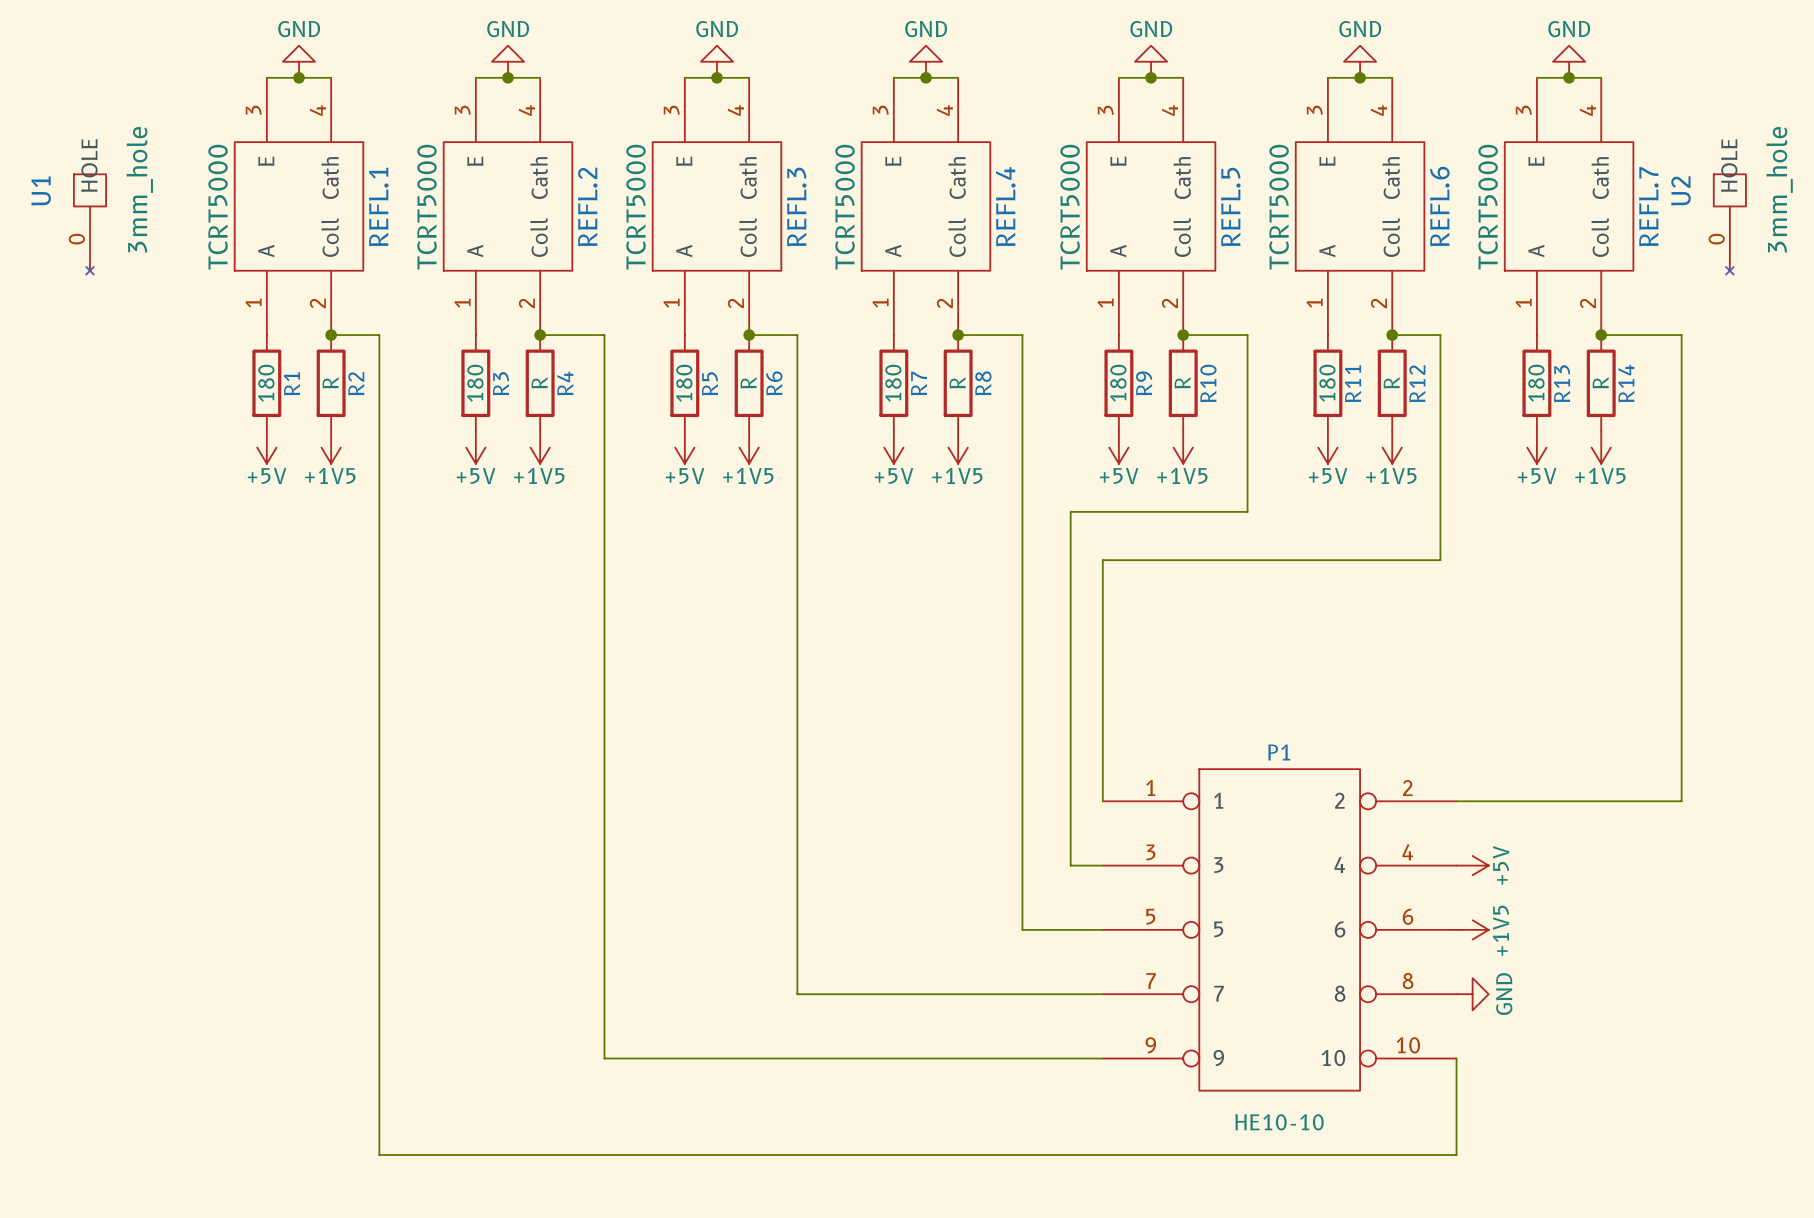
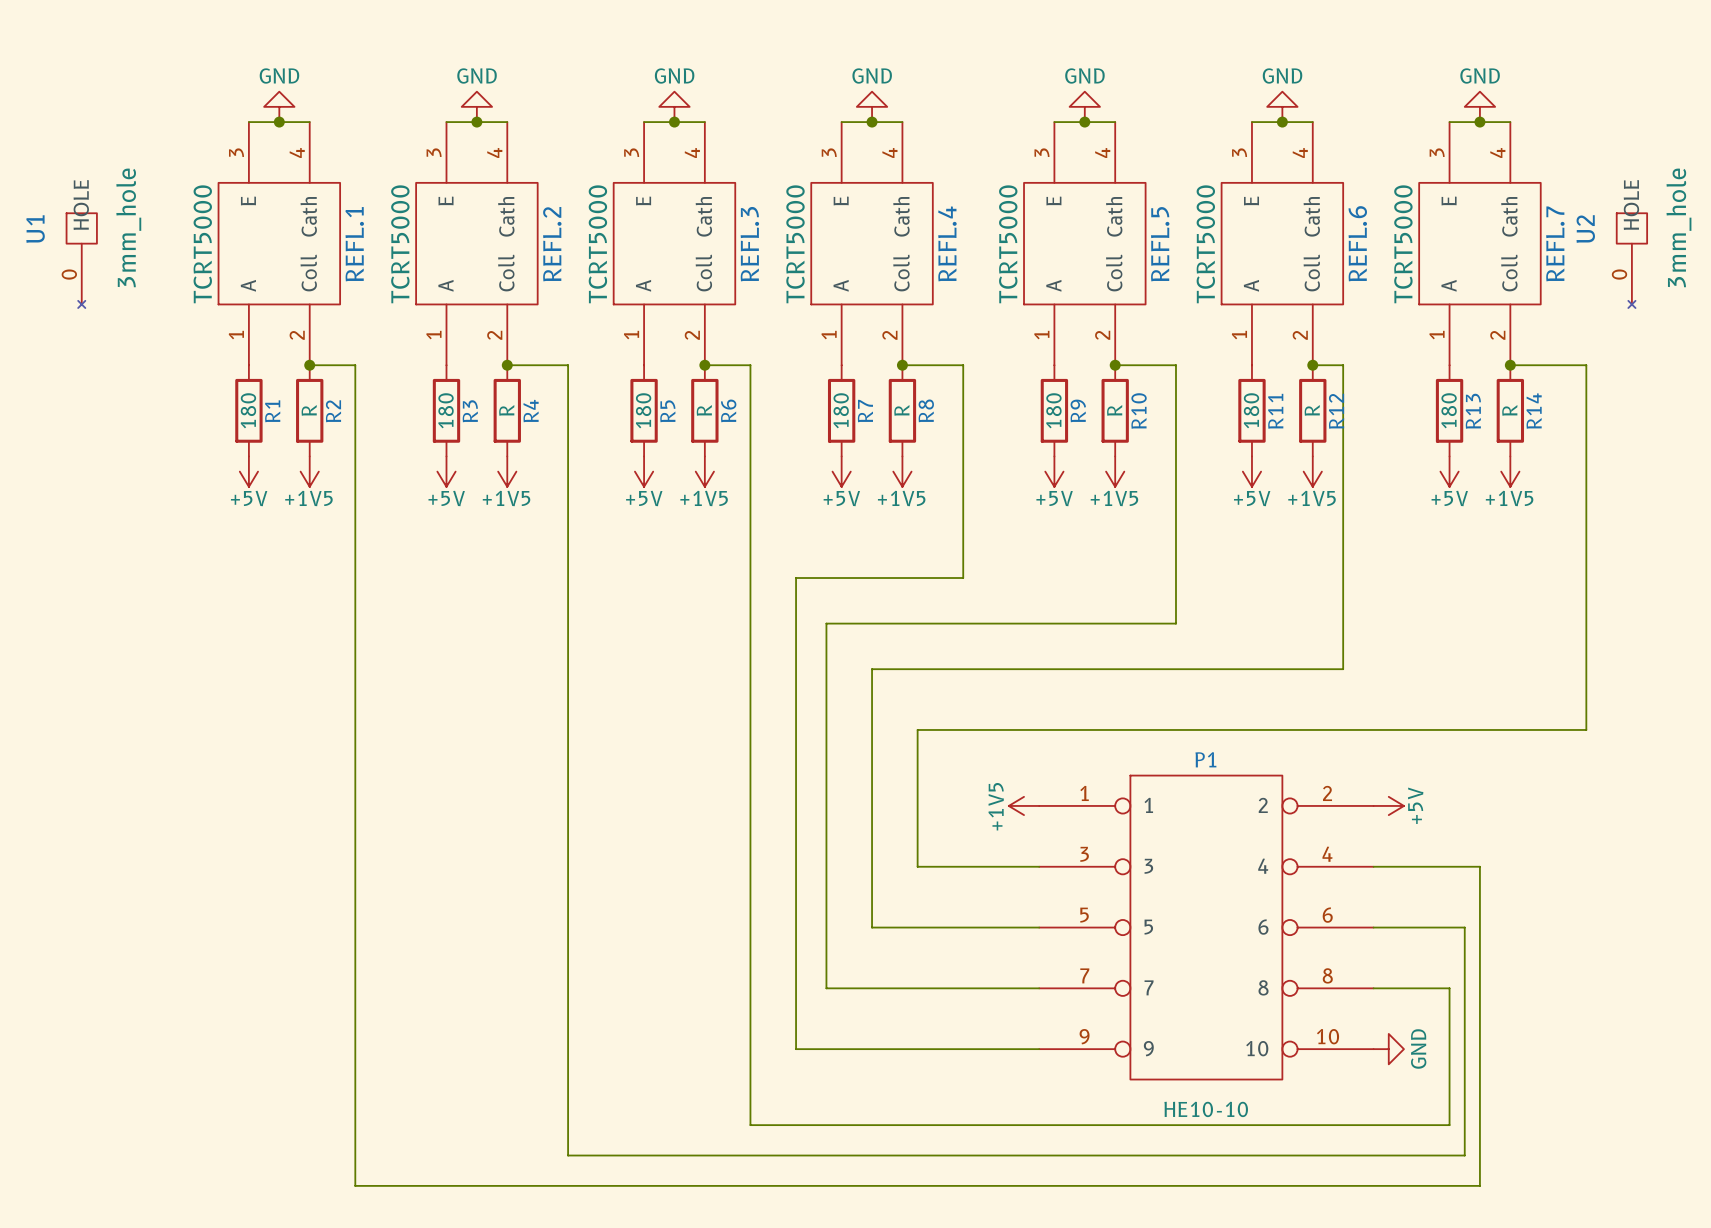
wire: (1424, 335) (1440, 335) (1440, 560) (1102, 560) (1102, 801) -> (1343, 365) (1343, 669) (872, 669) (872, 927) (963, 927)
wire: (1247, 511) (1070, 511) (1070, 865) -> (1175, 532) (1175, 623) (826, 623) (826, 988)
wire: (1022, 560) (1022, 929) -> (963, 578) (796, 578) (796, 1049)
wire: (1681, 720) (1681, 801) (1456, 801) -> (1586, 729) (917, 729) (917, 866) (1008, 866)
power symbol: none -> +1V5 (1024, 805)
power symbol position: +5V (1472, 865) -> +5V (1388, 805)
power symbol: +1V5 (1472, 929) -> none
wire: (797, 994) (877, 994) -> (750, 988) (750, 1125) (1449, 1125) (1449, 988) (1373, 988)
power symbol position: GND (1472, 994) -> GND (1388, 1049)
wire: (604, 1058) (845, 1058) -> (568, 1049) (568, 1155) (1464, 1155) (1464, 927) (1373, 927)
wire: (1456, 1058) (1456, 1154) (379, 1154) -> (1373, 866) (1479, 866) (1479, 1185) (355, 1185) (355, 1140)

